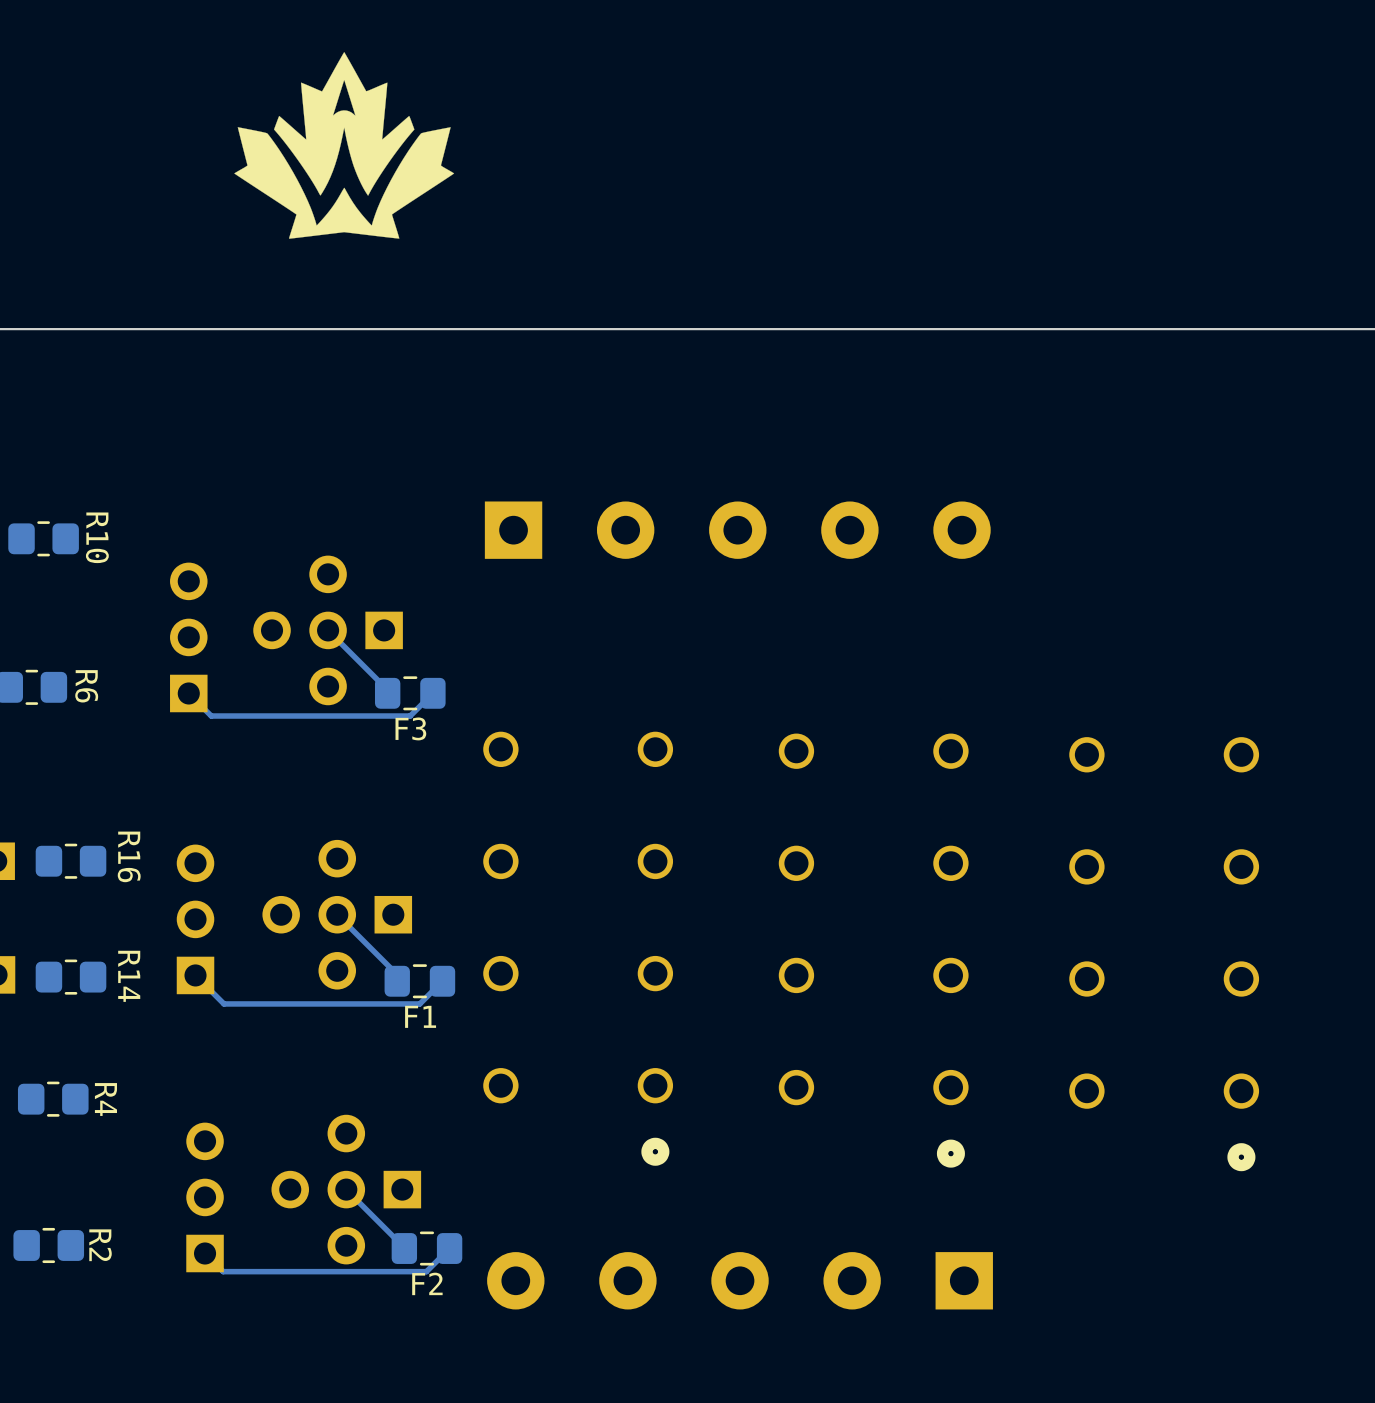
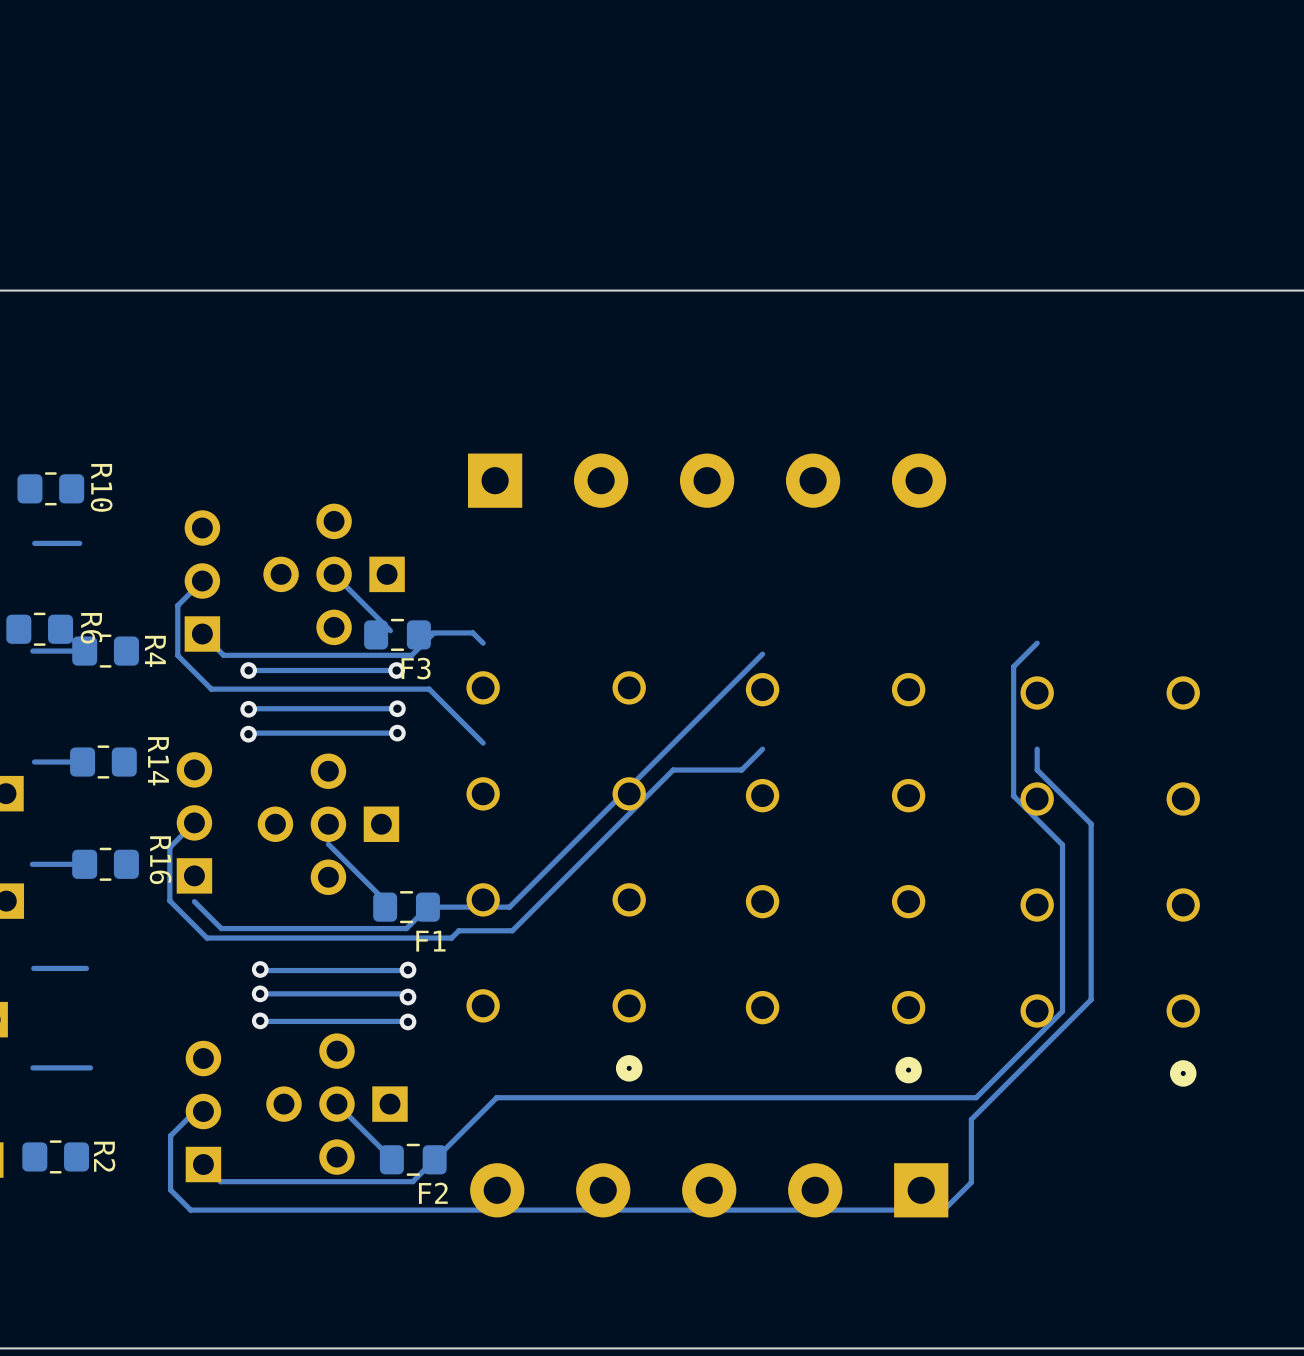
drawing: [234, 52, 455, 239] -> none
track: none -> (79, 543) (34, 543)
track: none -> (334, 574) (390, 630)
track: (328, 630) (387, 690) (387, 693) -> none
part position: (328, 630) -> (334, 574)
track: none -> (202, 581) (177, 605) (177, 655) (211, 689) (429, 689) (483, 743)
part position: (188, 637) -> (202, 581)
track: none -> (432, 632) (472, 632) (483, 643)
track: (432, 693) (410, 716) (211, 716) (188, 693) -> (433, 633) (411, 655) (223, 655) (202, 634)
track: none -> (1037, 643) (1013, 666) (1013, 796) (1062, 844) (1062, 1011) (976, 1097) (496, 1097) (434, 1159)
track: none -> (84, 651) (32, 651)
track: none -> (762, 654) (509, 907) (427, 907)
F3 name position: F3 (410, 728) -> F3 (416, 668)
via: none -> (248, 670)
track: none -> (396, 670) (248, 670)
via: none -> (396, 670)
via: none -> (248, 709)
track: none -> (397, 708) (248, 709)
via: none -> (397, 708)
track: none -> (397, 733) (248, 734)
via: none -> (397, 733)
via: none -> (248, 734)
track: none -> (762, 749) (741, 770) (673, 770) (512, 930) (458, 930) (451, 938) (206, 938) (169, 900) (169, 847) (194, 822)
track: none -> (1037, 749) (1037, 770) (1091, 824) (1091, 999) (971, 1119) (971, 1182) (943, 1210) (190, 1210) (170, 1189) (170, 1135) (194, 1111)
track: none -> (82, 762) (34, 762)
R16 position: (71, 861) -> (105, 864)
part position: (337, 914) -> (328, 824)
part position: (195, 919) -> (194, 822)
track: none -> (84, 864) (32, 864)
R14 position: (71, 977) -> (103, 762)
F1 name position: F1 (420, 1016) -> F1 (430, 941)
track: none -> (86, 968) (33, 968)
track: none -> (260, 969) (408, 970)
via: none -> (260, 969)
via: none -> (408, 970)
track: none -> (260, 993) (404, 993) (408, 997)
via: none -> (260, 993)
via: none -> (408, 997)
R4 position: (53, 1099) -> (105, 651)
track: none -> (260, 1020) (408, 1021)
via: none -> (260, 1020)
via: none -> (408, 1021)
track: none -> (90, 1067) (32, 1067)
F2 name position: F2 (427, 1283) -> F2 (433, 1193)

